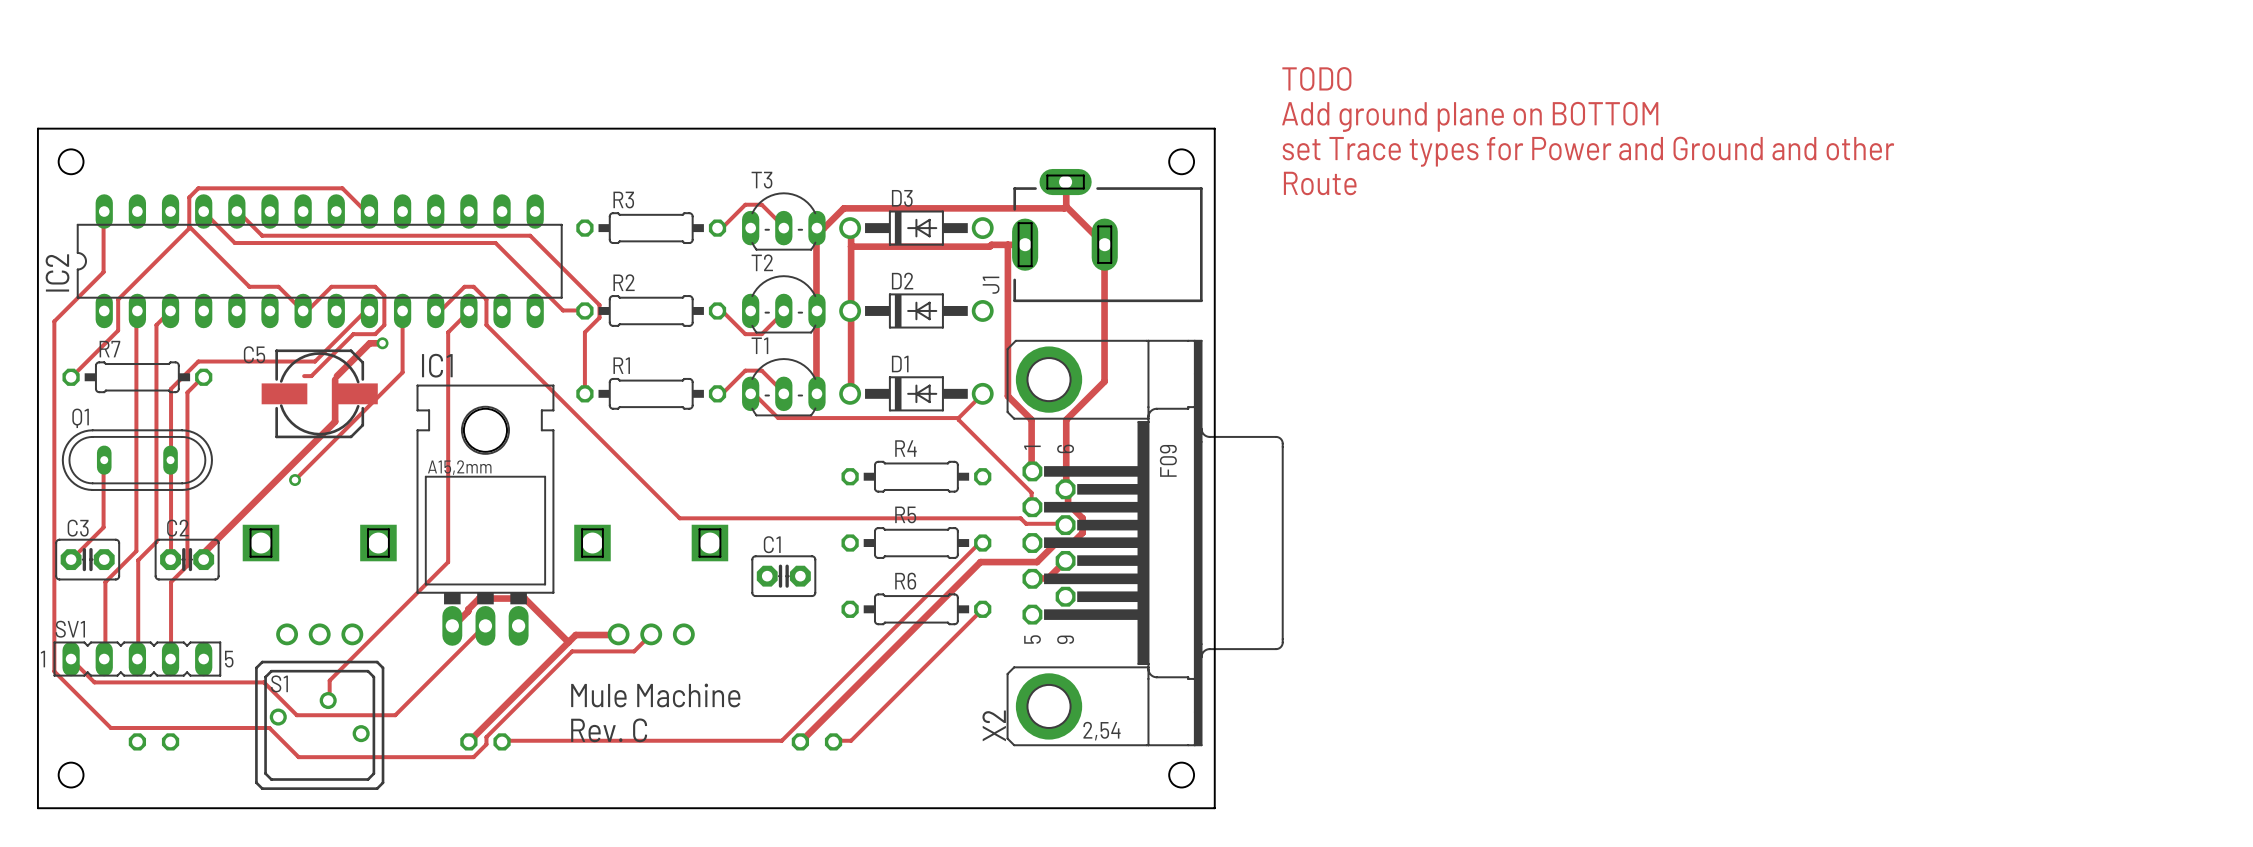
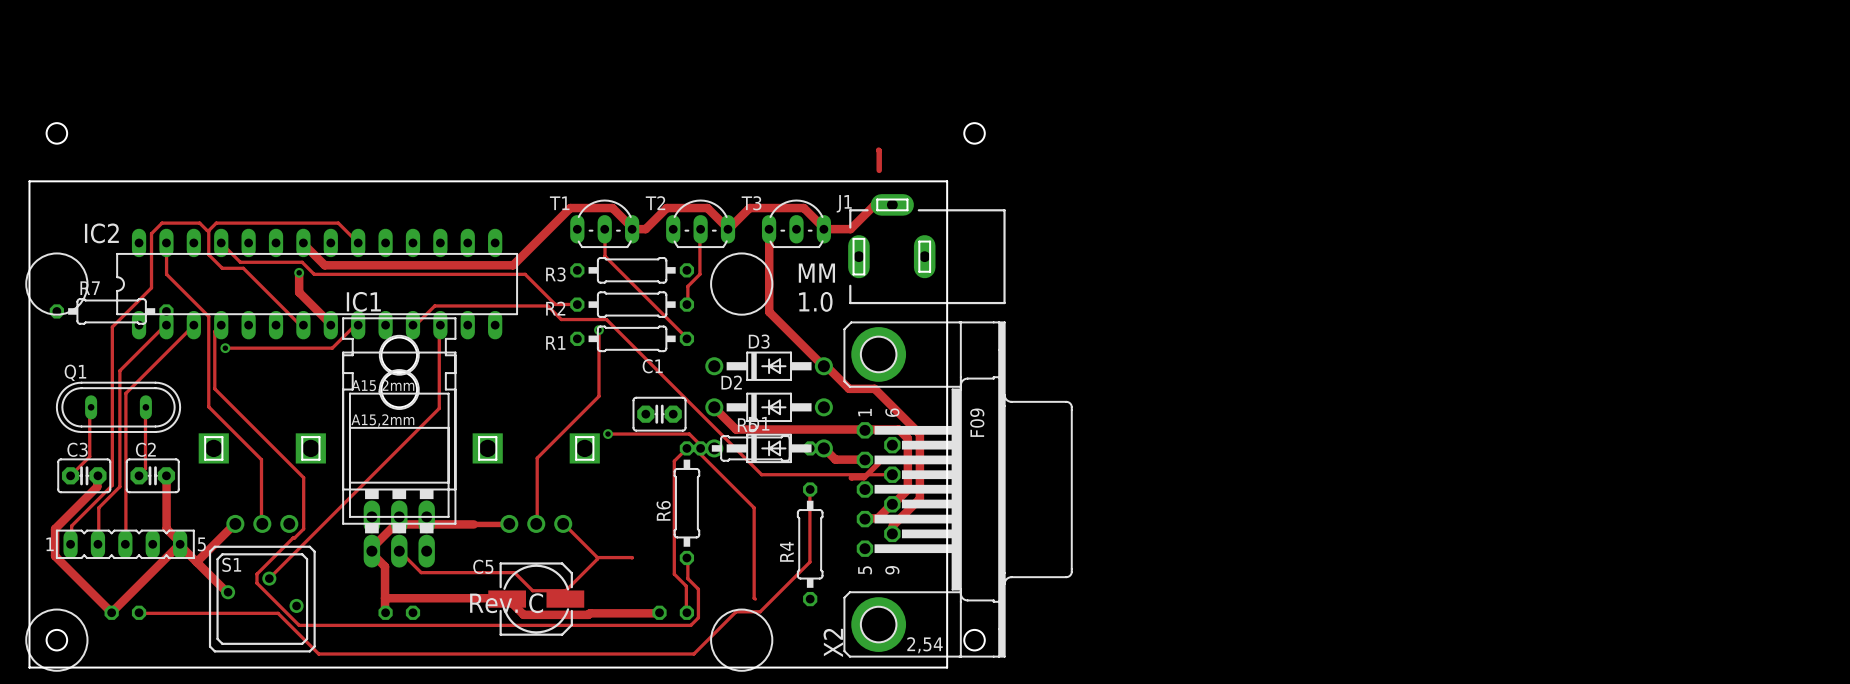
text: TODO (1316, 78) -> none
text: Add ground plane on BOTTOM (1470, 116) -> none
text: set Trace types for Power and Ground and other (1588, 151) -> none
T3 name position: T3 (761, 180) -> T3 (751, 203)
text: Route (1320, 183) -> none
R3 name position: R3 (623, 200) -> R3 (555, 274)
track: (104, 211) (103, 272) (54, 321) (54, 671) (110, 727) (269, 727) (298, 757) (364, 757) -> none
track: (203, 211) (234, 243) (495, 243) (563, 310) (584, 310) -> none
track: (236, 211) (262, 235) (530, 235) (599, 305) (599, 317) (584, 332) (584, 393) -> none
track: (369, 211) (364, 210) (342, 188) (198, 188) (189, 197) (189, 228) (118, 299) (118, 330) (71, 377) -> none
board edge: (37, 219) (37, 128) (1214, 128) (1214, 808) (1148, 808) -> (29, 181) (947, 181) (947, 667)
T3 position: (783, 221) -> (796, 223)
track: (189, 226) (249, 286) (278, 286) (303, 310) (307, 310) (331, 286) (375, 286) (384, 295) (384, 325) (375, 334) (353, 334) (311, 376) (304, 376) -> none
R3 position: (651, 228) -> (632, 270)
track: (717, 228) (723, 226) (745, 204) (761, 204) (783, 228) -> none
track: (850, 228) (850, 393) -> none
D3 position: (916, 228) -> (769, 366)
J1 position: (1107, 235) -> (926, 249)
track: (1007, 244) (1007, 396) (1031, 419) (1032, 471) -> none
track: (1025, 244) (991, 244) (989, 246) (851, 246) -> none
track: none -> (892, 204) (874, 205) (850, 229) (823, 229) (803, 208) (749, 208) (731, 226) (728, 229) (707, 208) (666, 208) (645, 229) (632, 229)
IC2 position: (319, 261) -> (317, 284)
T2 name position: T2 (762, 262) -> T2 (655, 203)
IC2 name rotation: 0° (57, 272) -> 90° clockwise (101, 233)
track: none -> (604, 229) (605, 256) (686, 338)
track: none -> (632, 229) (612, 208) (570, 208) (513, 265) (324, 265) (303, 242)
track: none -> (700, 229) (699, 274) (687, 286) (686, 304)
track: none -> (769, 229) (769, 312) (849, 388) (874, 388) (919, 434) (919, 498) (892, 525) (892, 533)
track: none -> (208, 230) (208, 254) (222, 268) (243, 268) (299, 324) (303, 325)
track: none -> (208, 230) (216, 223) (338, 223) (358, 242)
D2 name position: D2 (902, 281) -> D2 (731, 382)
R2 name position: R2 (624, 282) -> R2 (555, 308)
J1 name rotation: 0° (991, 285) -> 90° clockwise (844, 203)
J1 name position: J1 (991, 285) -> J1 (844, 203)
track: none -> (166, 242) (166, 274) (208, 316) (208, 406) (261, 459) (262, 523)
track: none -> (221, 242) (240, 262) (302, 262) (314, 274) (525, 274) (555, 304) (577, 304)
T2 position: (783, 304) -> (700, 223)
drawing: none -> [25, 252, 89, 316]
drawing: none -> [710, 252, 774, 316]
track: (137, 310) (136, 551) (105, 582) (104, 659) -> none
track: (170, 310) (156, 325) (156, 542) (138, 560) -> (208, 230) (199, 223) (162, 223) (151, 233) (151, 287) (112, 327) (112, 462)
track: (369, 310) (364, 312) (315, 361) (198, 361) (171, 388) (170, 559) -> none
track: (402, 310) (402, 372) (295, 480) -> none
track: (435, 310) (440, 310) (464, 286) (473, 286) (486, 299) (486, 325) (679, 518) (1020, 518) (1026, 523) (1065, 525) -> none
track: (468, 310) (448, 332) (448, 562) (369, 640) -> (221, 325) (214, 331) (214, 388) (303, 477) (303, 528)
R2 position: (651, 310) -> (632, 304)
track: (717, 310) (723, 312) (745, 334) (761, 334) (783, 310) -> none
D2 position: (916, 310) -> (769, 407)
track: none -> (299, 272) (299, 292) (330, 325)
text: none -> MM (816, 273)
track: (382, 343) (369, 343) (336, 376) -> none
via position: (382, 343) -> (299, 272)
T1 name position: T1 (759, 345) -> T1 (559, 203)
R1 name position: R1 (621, 365) -> R1 (555, 342)
text: none -> 1.0 (815, 301)
track: (203, 377) (187, 392) (187, 565) (171, 582) (170, 659) -> none
track: (335, 379) (335, 421) (203, 552) (203, 559) -> none
T1 position: (783, 387) -> (604, 223)
track: none -> (166, 325) (119, 370) (119, 486) (98, 507) (97, 544)
track: none -> (193, 325) (125, 393) (125, 544)
C5 position: (319, 393) -> (536, 599)
track: none -> (358, 325) (354, 325) (332, 348) (225, 348)
track: none -> (412, 325) (416, 324) (434, 305) (547, 305) (561, 319) (606, 319) (761, 474) (892, 474)
track: none -> (440, 325) (439, 408) (270, 577)
R1 position: (651, 393) -> (632, 338)
track: (717, 393) (723, 392) (745, 370) (761, 370) (783, 393) -> none
track: (750, 393) (754, 394) (778, 418) (958, 418) -> none
track: (816, 393) (816, 228) (823, 228) (843, 208) (1064, 208) (1066, 206) (1104, 244) (1104, 381) (1066, 419) (1065, 489) (1068, 490) (1068, 503) (1082, 518) (1082, 532) (1071, 543) (1055, 543) (1037, 562) (980, 562) (800, 741) -> (385, 598) (504, 598) (508, 599) (523, 614) (659, 612)
D1 position: (916, 393) -> (769, 448)
track: (982, 393) (958, 418) -> none
track: none -> (598, 330) (598, 396) (537, 458) (536, 523)
via: none -> (598, 330)
track: (958, 418) (1031, 492) (1032, 507) -> none
R4 name position: R4 (905, 448) -> R4 (786, 551)
track: (104, 460) (103, 527) (71, 559) -> none
Q1 position: (137, 460) -> (118, 407)
R4 rotation: 0° (916, 476) -> 90° clockwise (810, 544)
R4 position: (916, 476) -> (810, 544)
via position: (295, 480) -> (225, 348)
track: none -> (91, 407) (89, 456) (70, 475)
track: none -> (145, 407) (145, 468) (139, 475)
track: none -> (714, 407) (736, 429) (898, 429) (907, 438) (907, 489) (877, 518) (864, 519)
track: none -> (608, 434) (689, 434) (698, 443) (698, 452) (754, 507) (755, 599)
via: none -> (608, 434)
track: (982, 543) (978, 543) (781, 740) (502, 741) -> none
track: none -> (823, 448) (835, 459) (864, 459)
X2 position: (1145, 543) -> (958, 489)
C1 name position: C1 (772, 544) -> C1 (652, 366)
part: none -> (399, 459)
C3 position: (87, 559) -> (84, 475)
C2 position: (187, 559) -> (152, 475)
track: none -> (97, 475) (97, 486) (55, 528) (55, 556) (111, 612) (180, 544)
track: none -> (166, 475) (166, 528) (180, 544)
C1 position: (783, 576) -> (659, 414)
R6 name position: R6 (905, 581) -> R6 (663, 510)
track: (138, 587) (137, 659) -> (112, 485) (71, 525) (70, 544)
track: none -> (810, 489) (809, 562) (760, 611) (736, 611) (693, 654) (318, 654) (278, 613) (139, 612)
R6 rotation: 0° (916, 609) -> 90° clockwise (686, 503)
track: (982, 609) (851, 740) (833, 741) -> (686, 448) (674, 461) (674, 574) (686, 586) (686, 612)
track: (452, 625) (479, 598) (524, 598) (568, 642) -> none
track: (485, 625) (395, 715) (296, 715) (264, 682) (94, 682) (71, 659) -> none
track: none -> (235, 523) (196, 562)
track: (651, 634) (634, 651) (572, 651) (486, 737) (486, 744) (473, 757) -> (686, 557) (687, 578) (698, 589) (698, 617) (690, 625) (389, 625)
track: none -> (563, 523) (597, 557)
track: (575, 635) (468, 741) -> (473, 524) (395, 524) (372, 547) (371, 551) (385, 566) (385, 612)
track: (358, 651) (329, 680) (329, 698) -> (294, 537) (256, 574) (256, 583) (299, 625)
SV1: (137, 659) -> none
part: none -> (125, 544)
track: none -> (180, 544) (228, 592)
track: none -> (399, 551) (421, 572) (514, 572) (532, 590) (564, 590) (565, 599) (565, 590) (597, 557)
track: none -> (597, 557) (632, 557)
text: Mule Machine (655, 695) -> none
drawing: none -> [25, 608, 89, 672]
drawing: none -> [710, 608, 774, 672]

